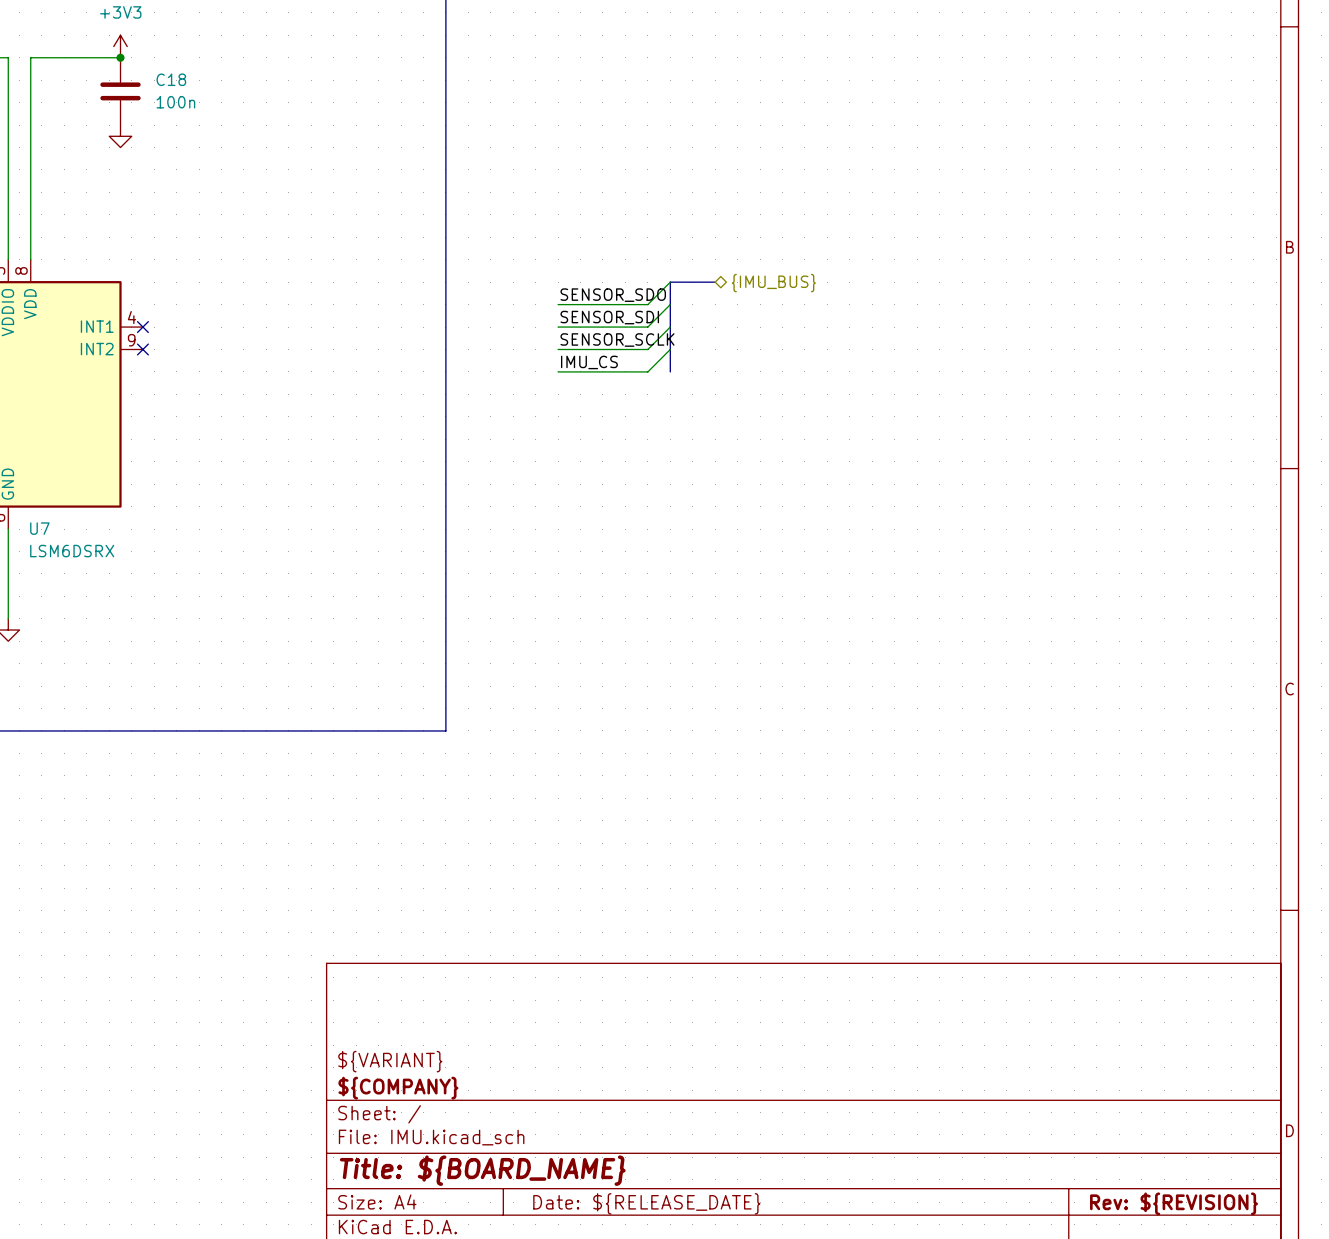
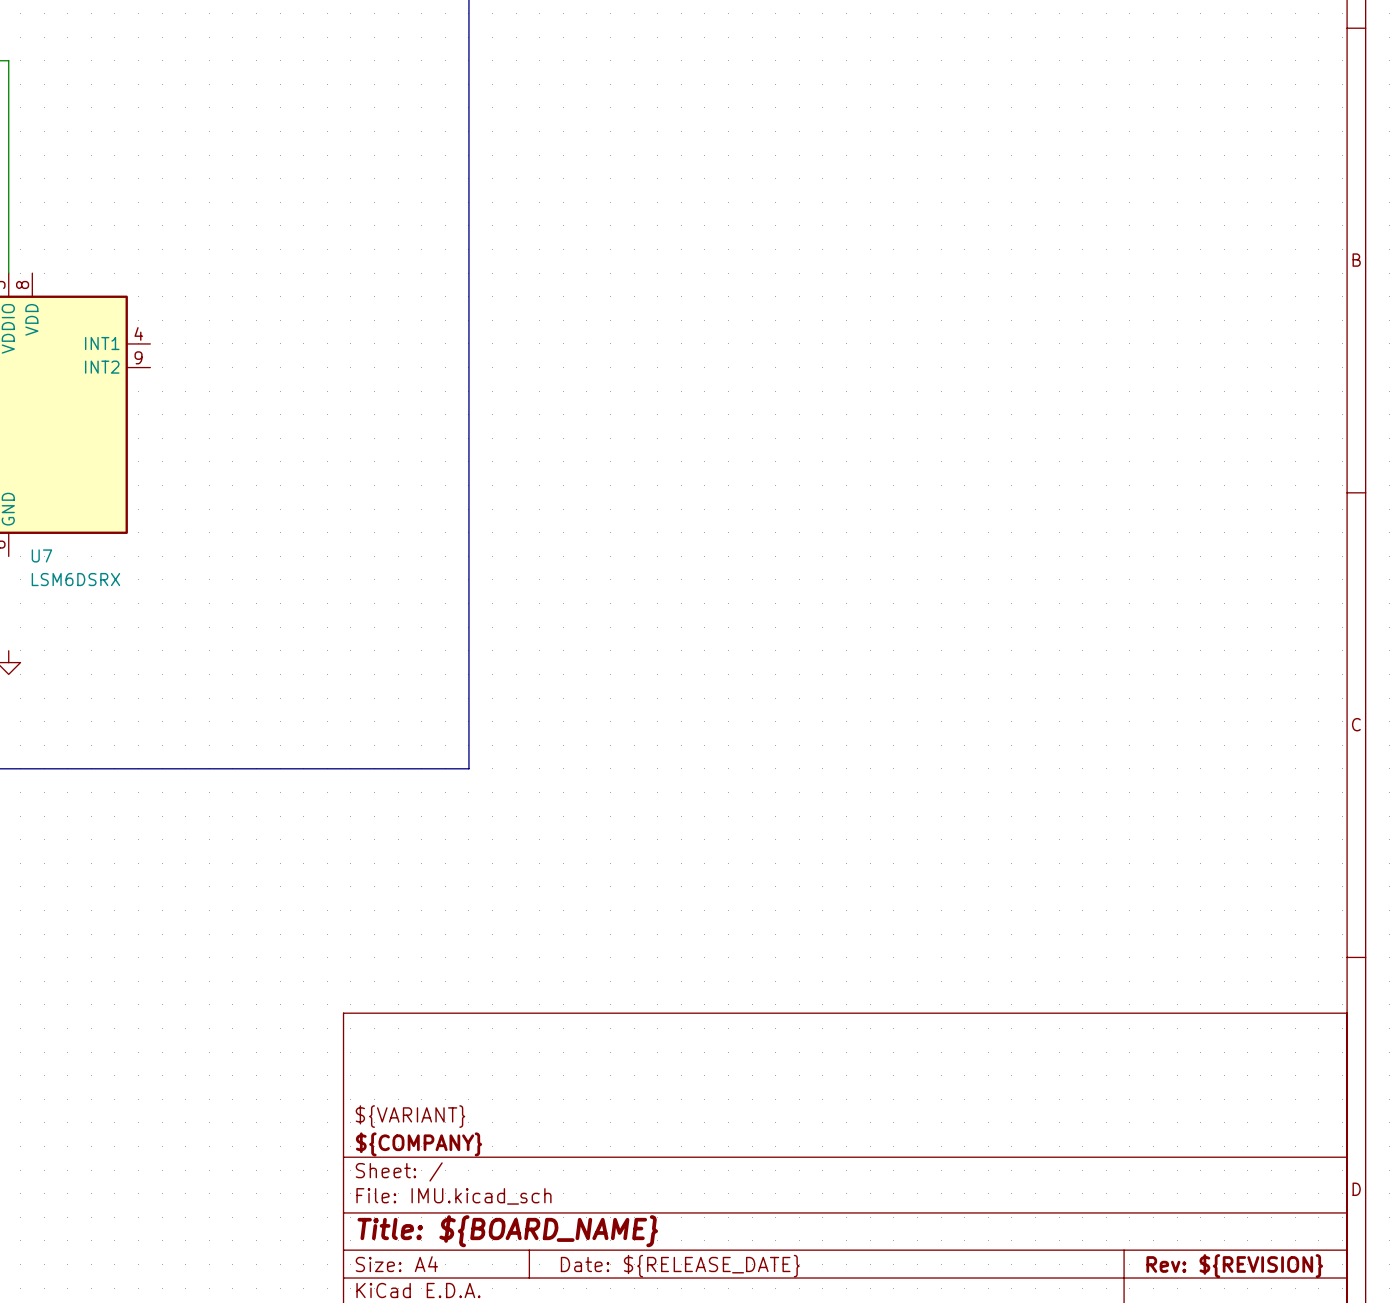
power symbol: +3V3 (120, 46) -> none
wire: (120, 57) (30, 57) (30, 259) -> none
junction: (120, 57) -> none
C18: 100n (120, 91) -> none
power symbol: (120, 136) -> none
wire: (670, 282) (647, 304) (558, 304) -> none
bus: (715, 282) (670, 282) (670, 371) -> none
hierarchical label: {IMU_BUS} (773, 283) -> none
label: SENSOR_SDO (613, 295) -> none
wire: (670, 304) (647, 327) (558, 327) -> none
label: SENSOR_SDI (609, 317) -> none
no-connect mark: (142, 327) -> none
wire: (670, 327) (647, 349) (558, 349) -> none
label: SENSOR_SCLK (617, 340) -> none
no-connect mark: (142, 349) -> none
wire: (670, 349) (647, 371) (558, 371) -> none
label: IMU_CS (589, 362) -> none
wire: (8, 529) (8, 618) -> none

